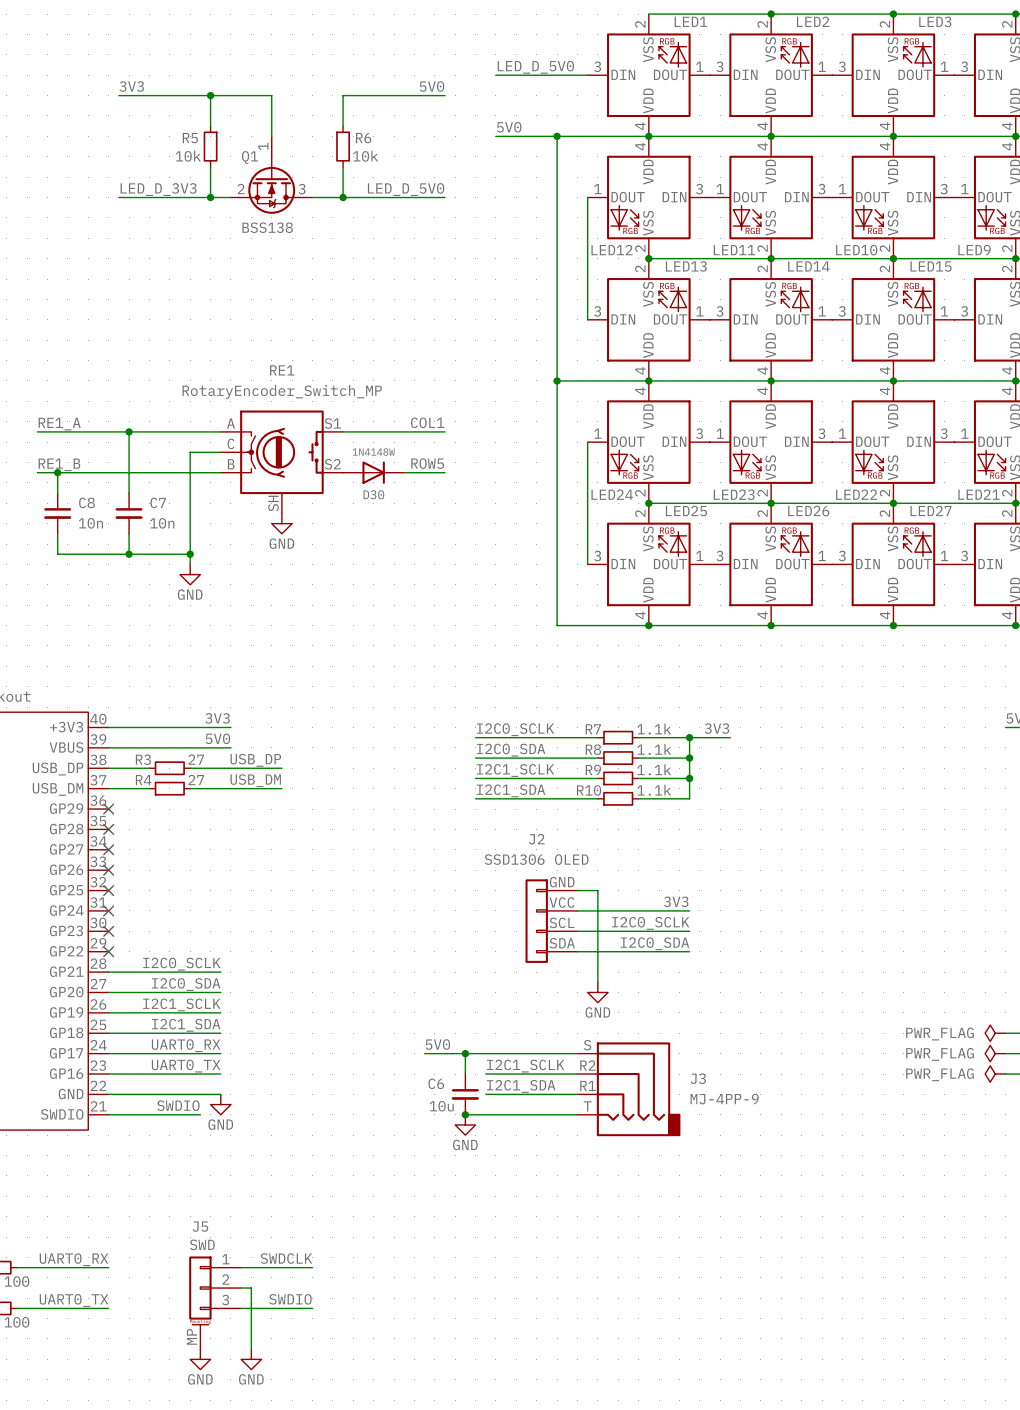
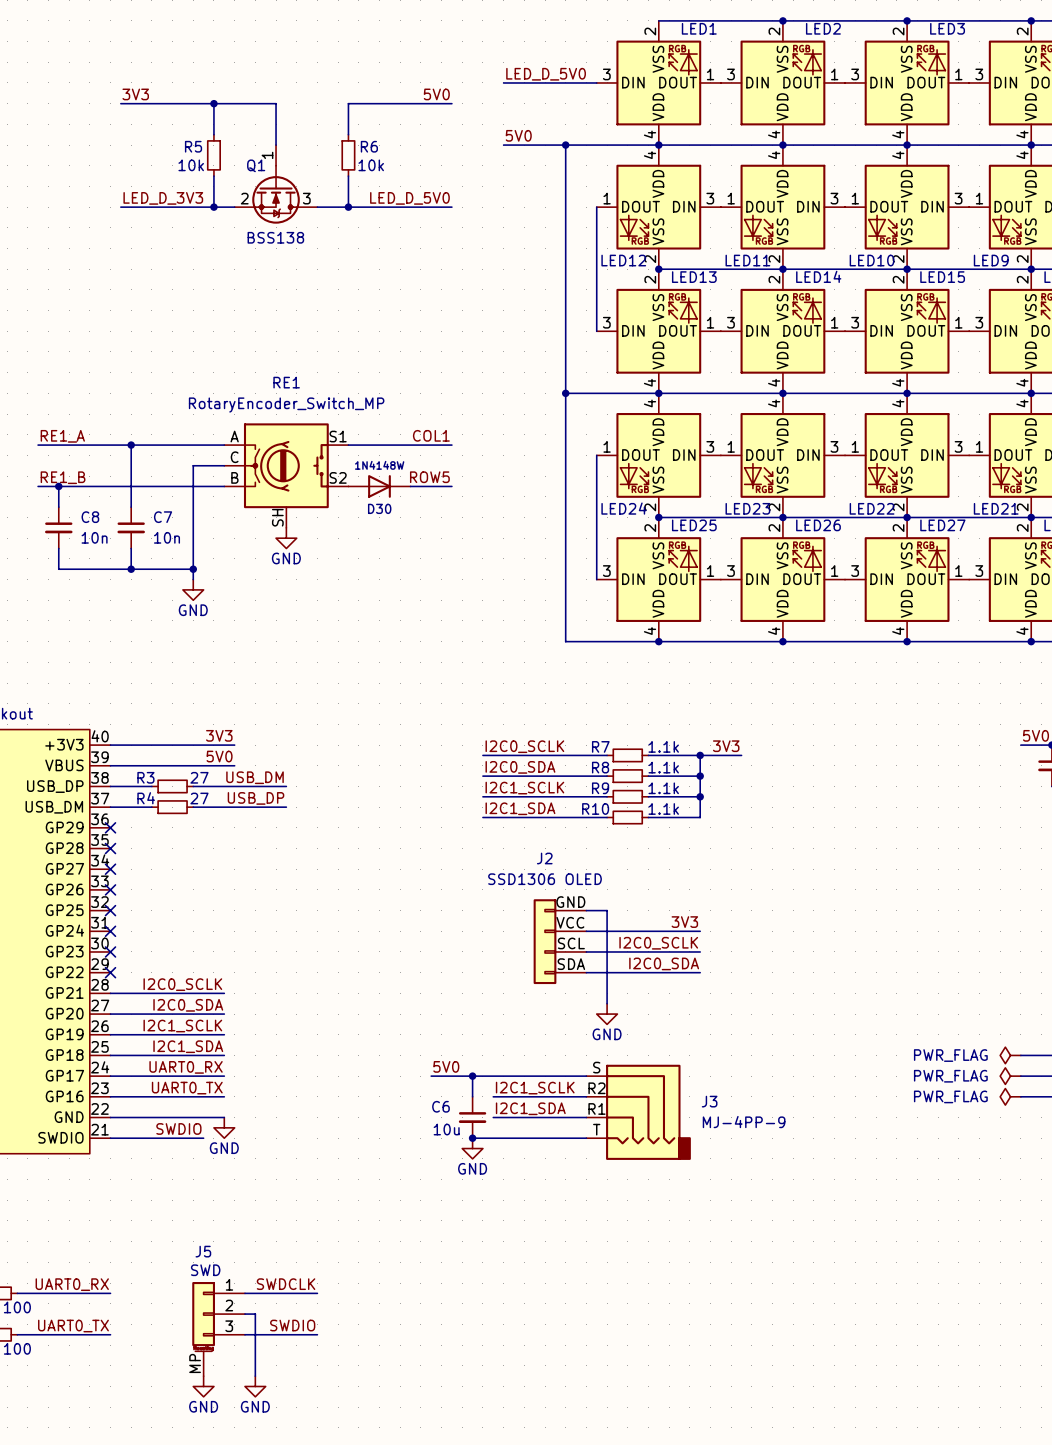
label: USB_DP (255, 760) -> USB_DM (255, 777)
label: USB_DM (255, 780) -> USB_DP (256, 798)

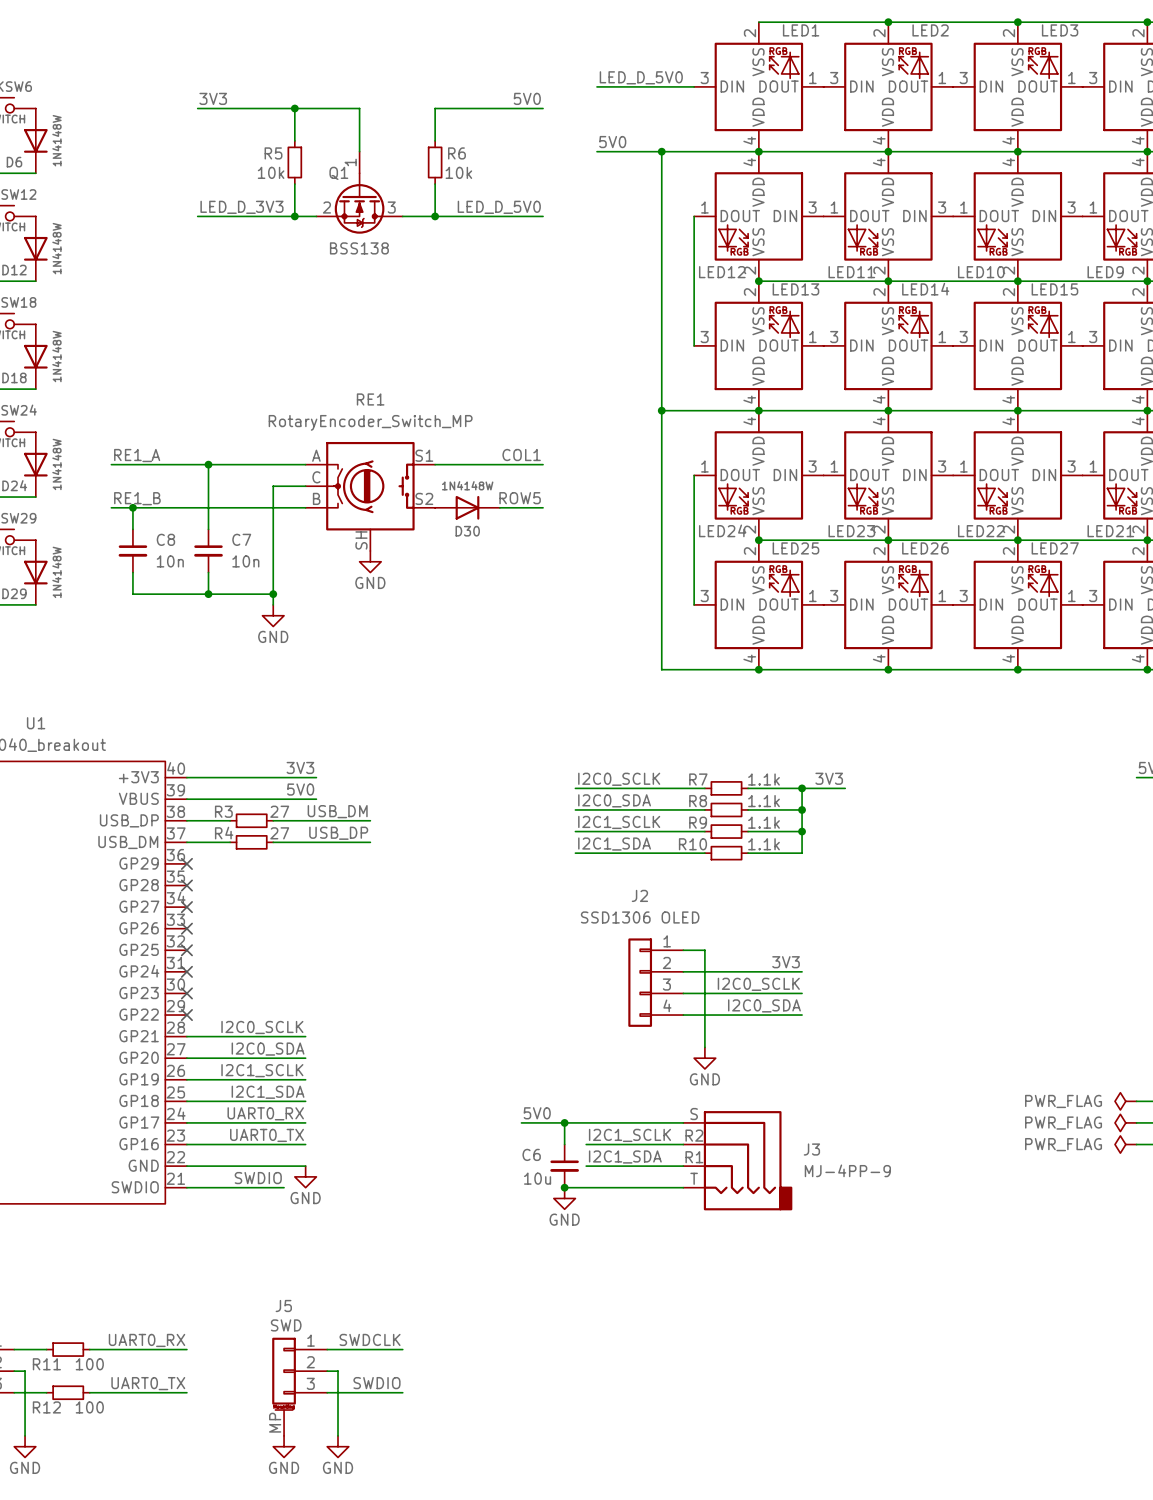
J2 pin number: GND (570, 902) -> 1 (667, 941)
J2 pin number: VCC (570, 922) -> 2 (666, 962)
J2 pin number: SCL (571, 943) -> 3 (666, 984)
J2 pin number: SDA (571, 964) -> 4 (667, 1005)

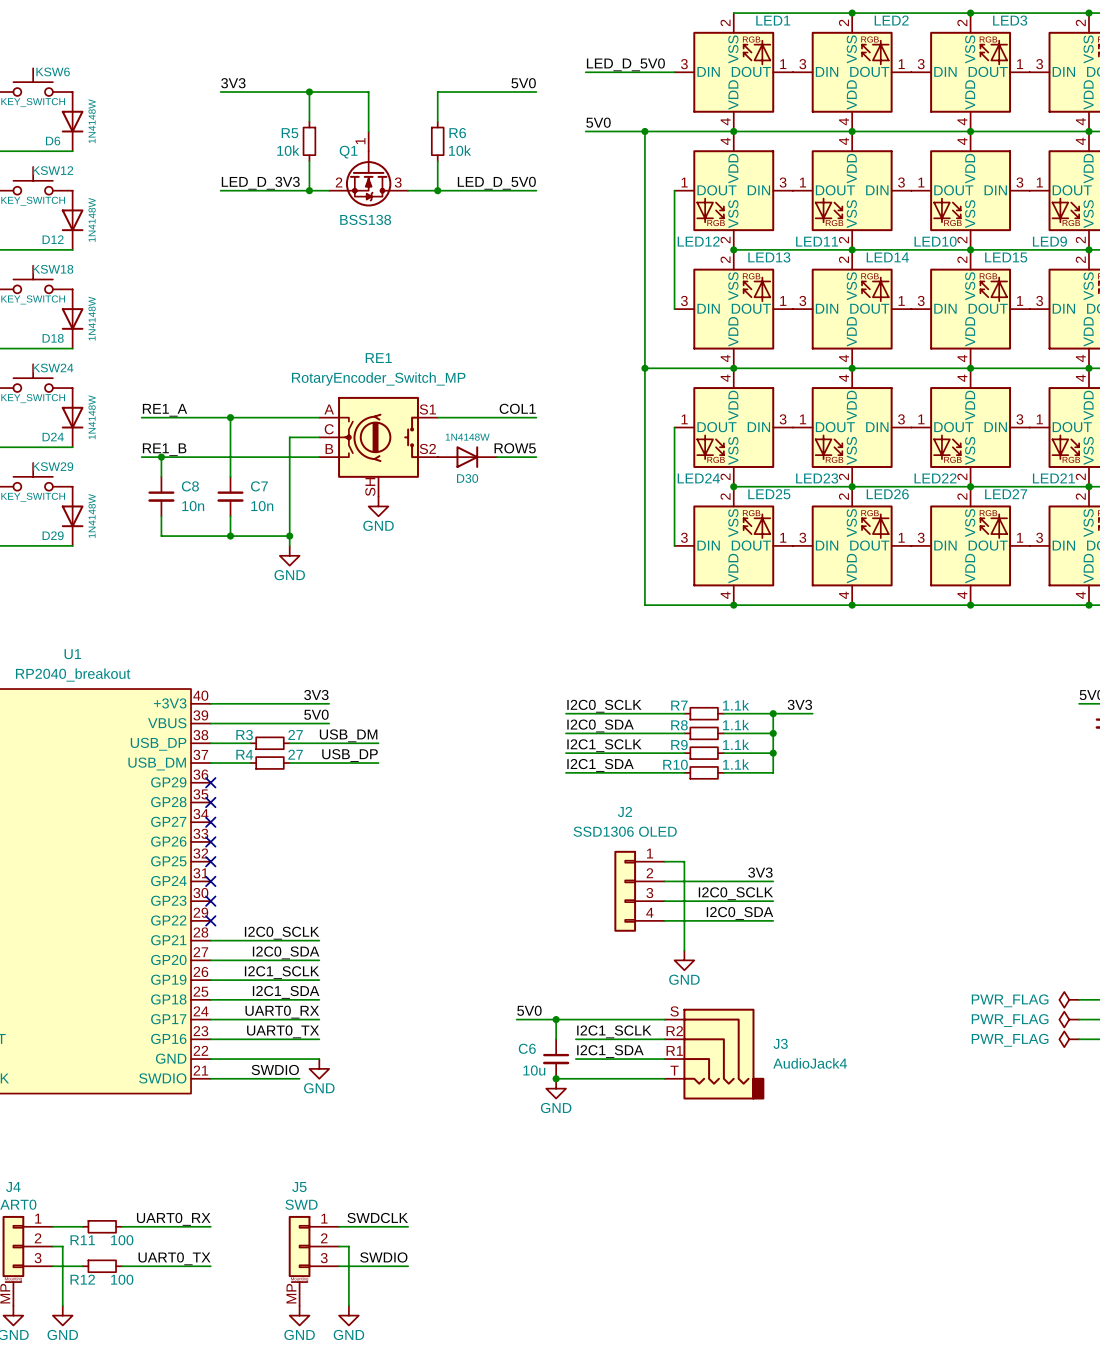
J3 value: MJ-4PP-9 (847, 1170) -> AudioJack4 (810, 1063)

